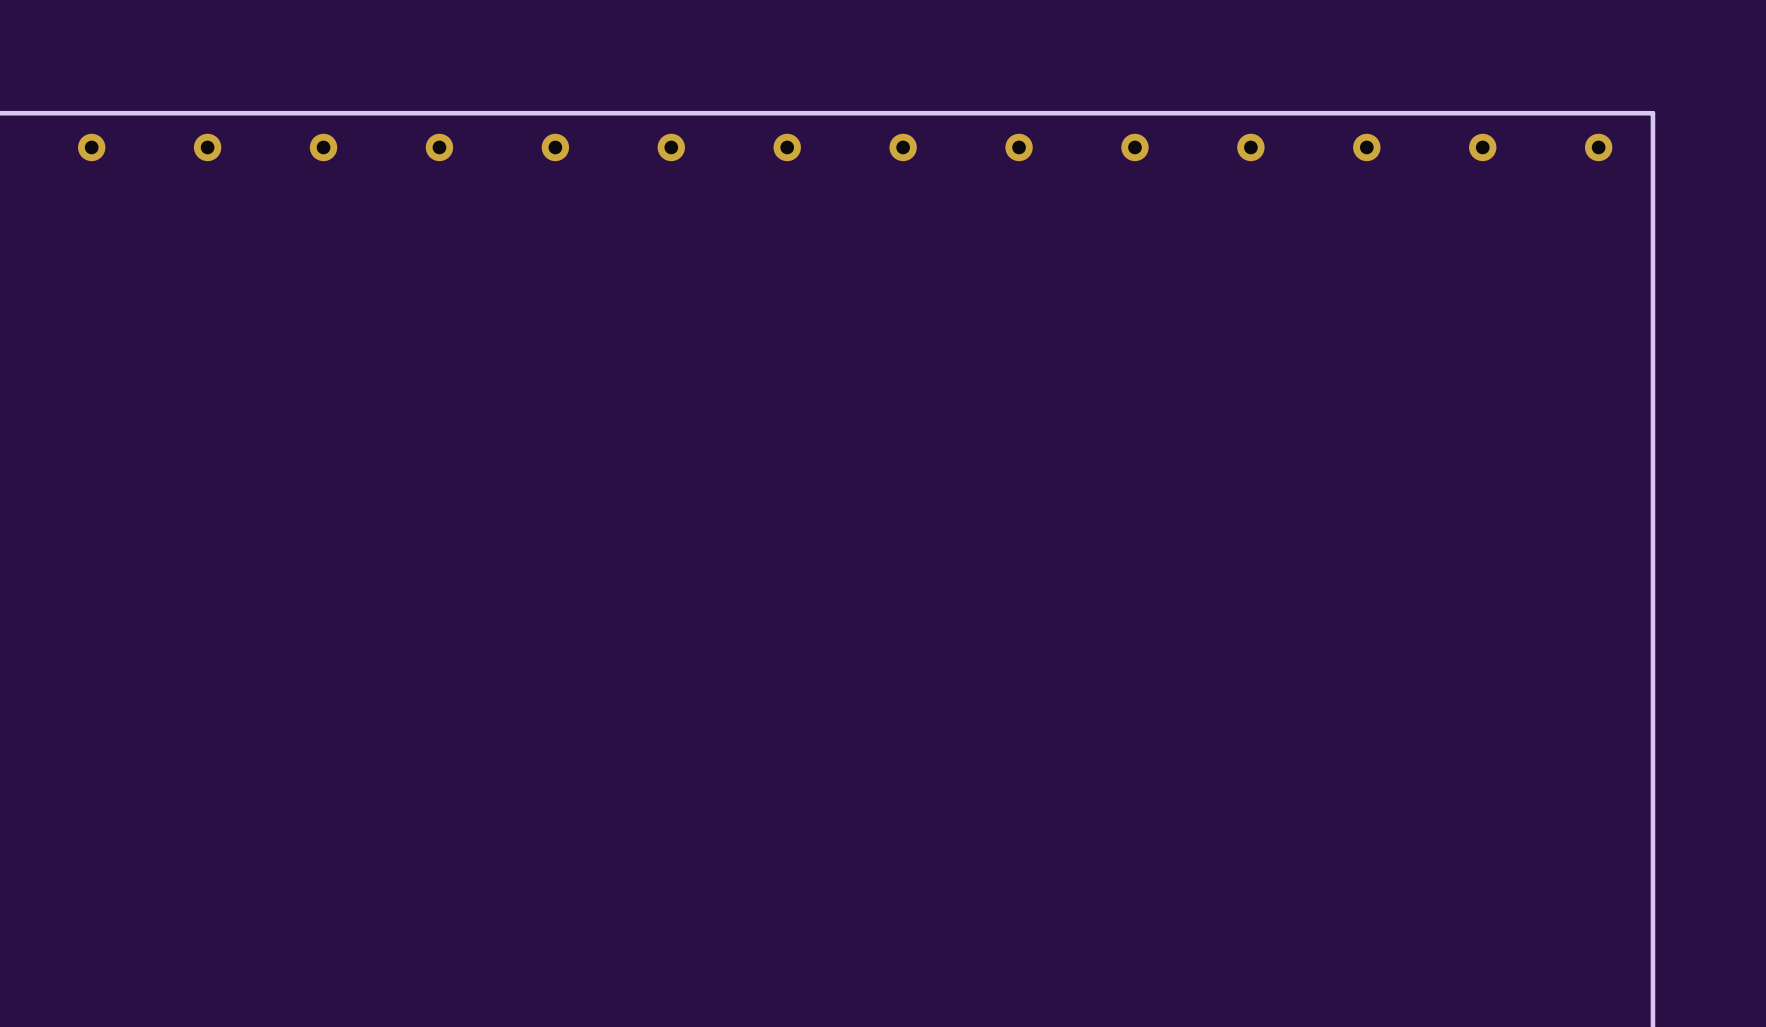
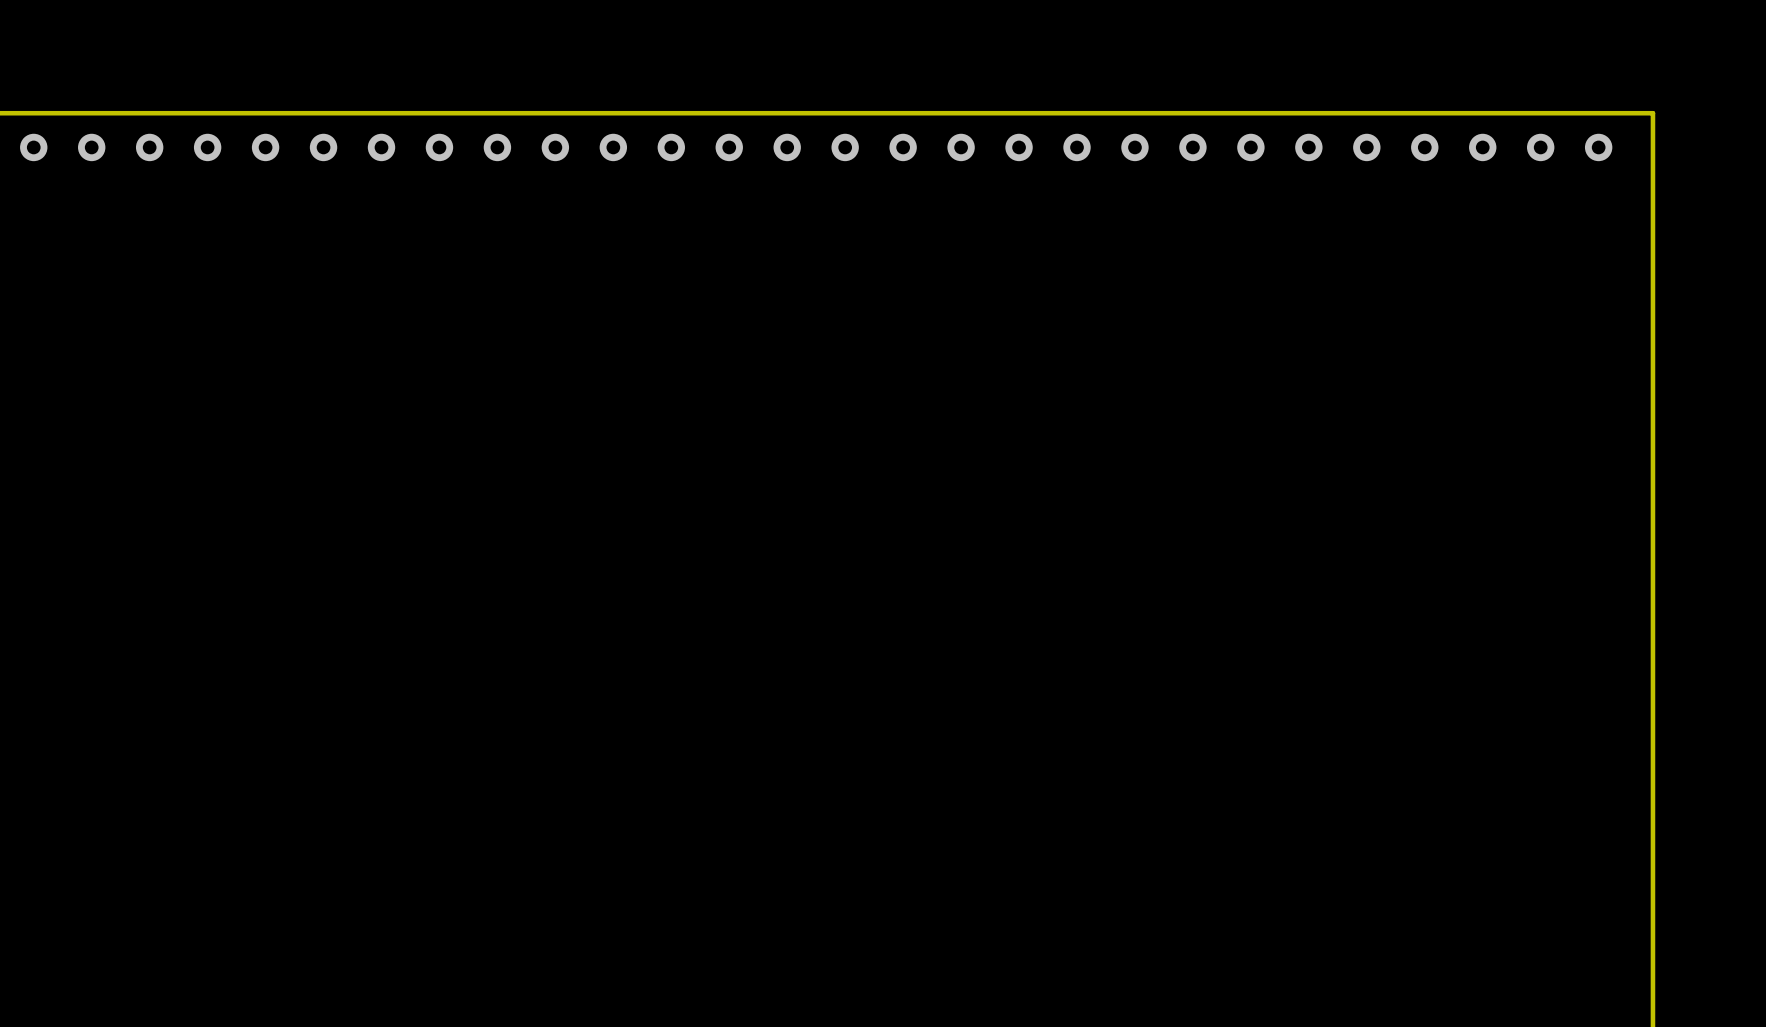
via: none -> (33, 147)
via: none -> (149, 147)
via: none -> (265, 147)
via: none -> (381, 147)
via: none -> (497, 147)
via: none -> (613, 147)
via: none -> (729, 147)
via: none -> (845, 147)
via: none -> (961, 147)
via: none -> (1077, 147)
via: none -> (1192, 147)
via: none -> (1308, 147)
via: none -> (1424, 147)
via: none -> (1540, 147)

